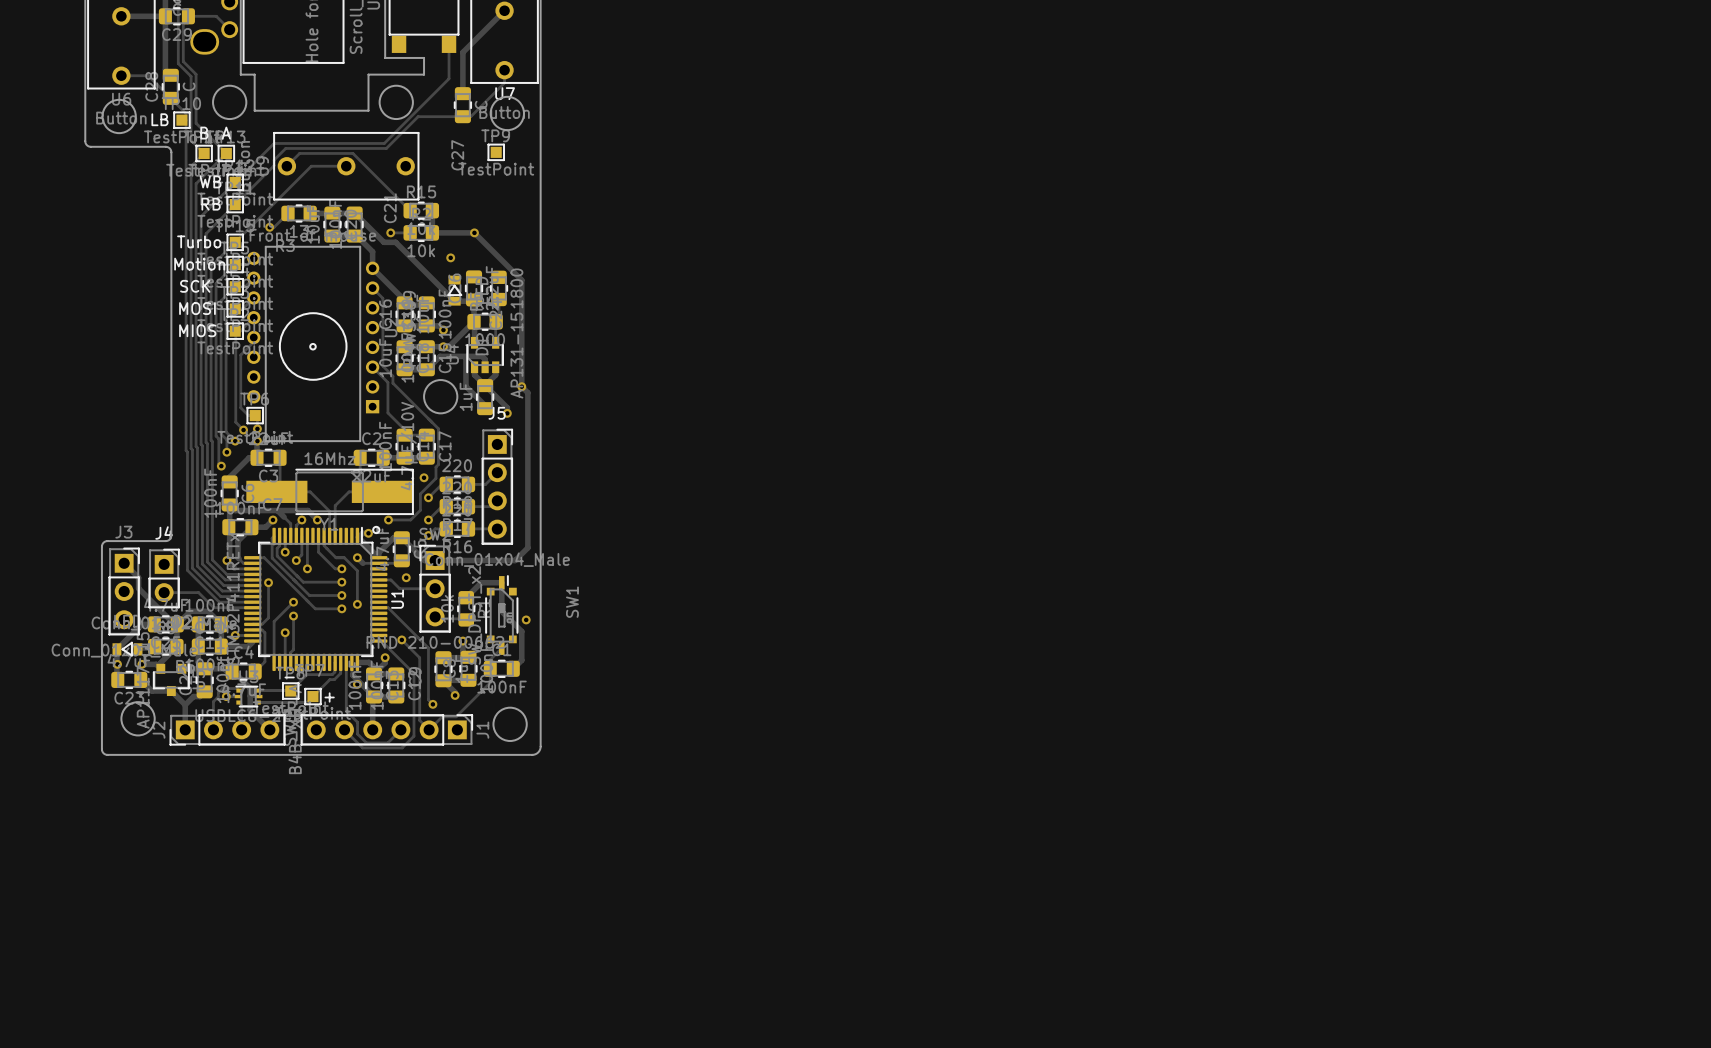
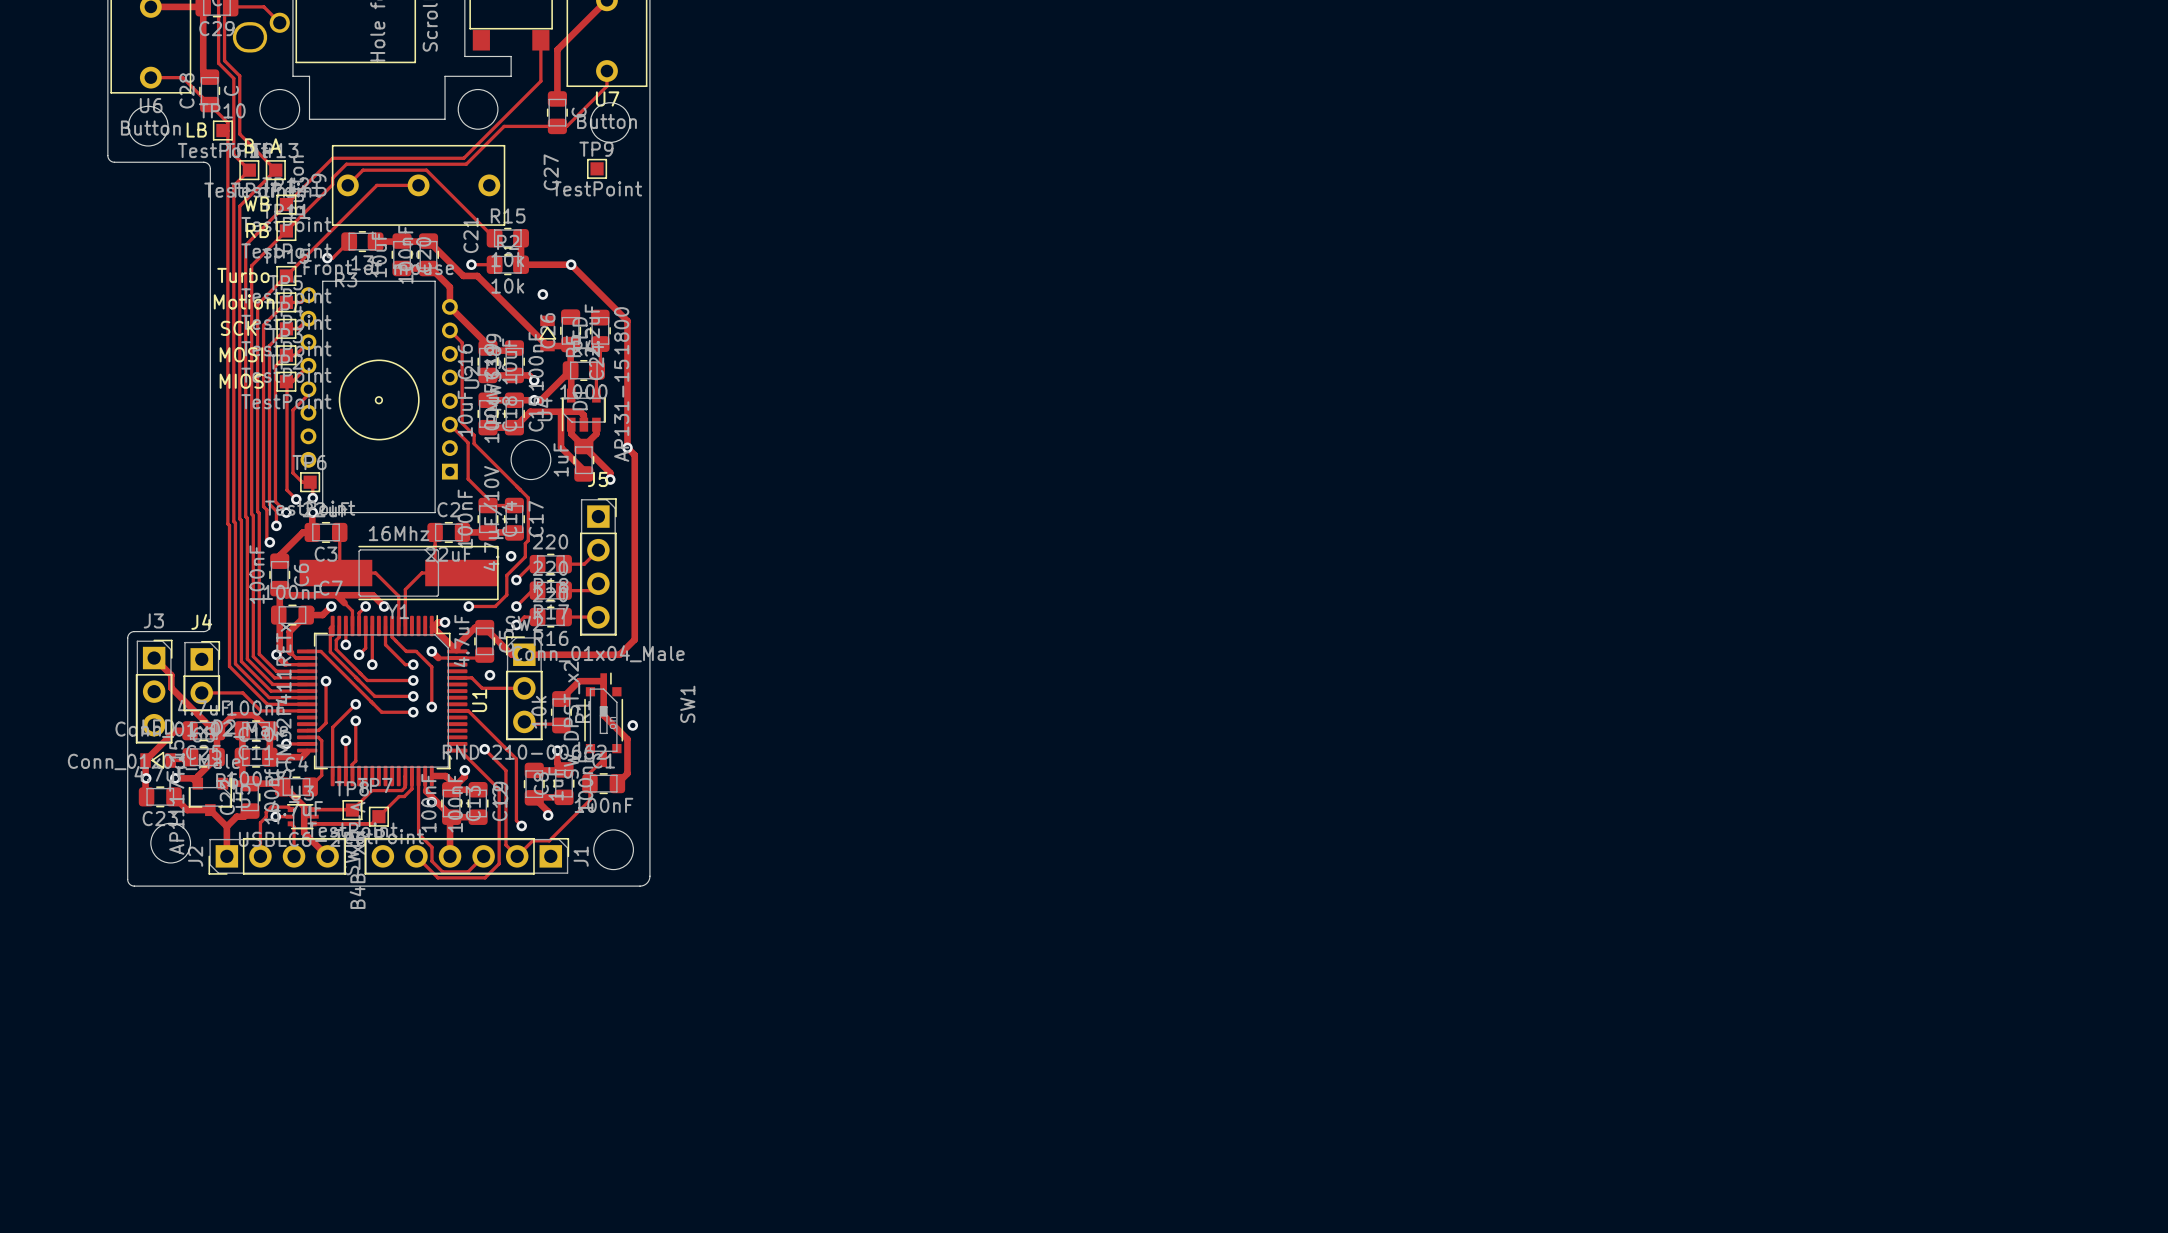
drawing: [372, 526, 381, 534] -> none
text: - (289, 677) -> none
text: + (329, 697) -> none

